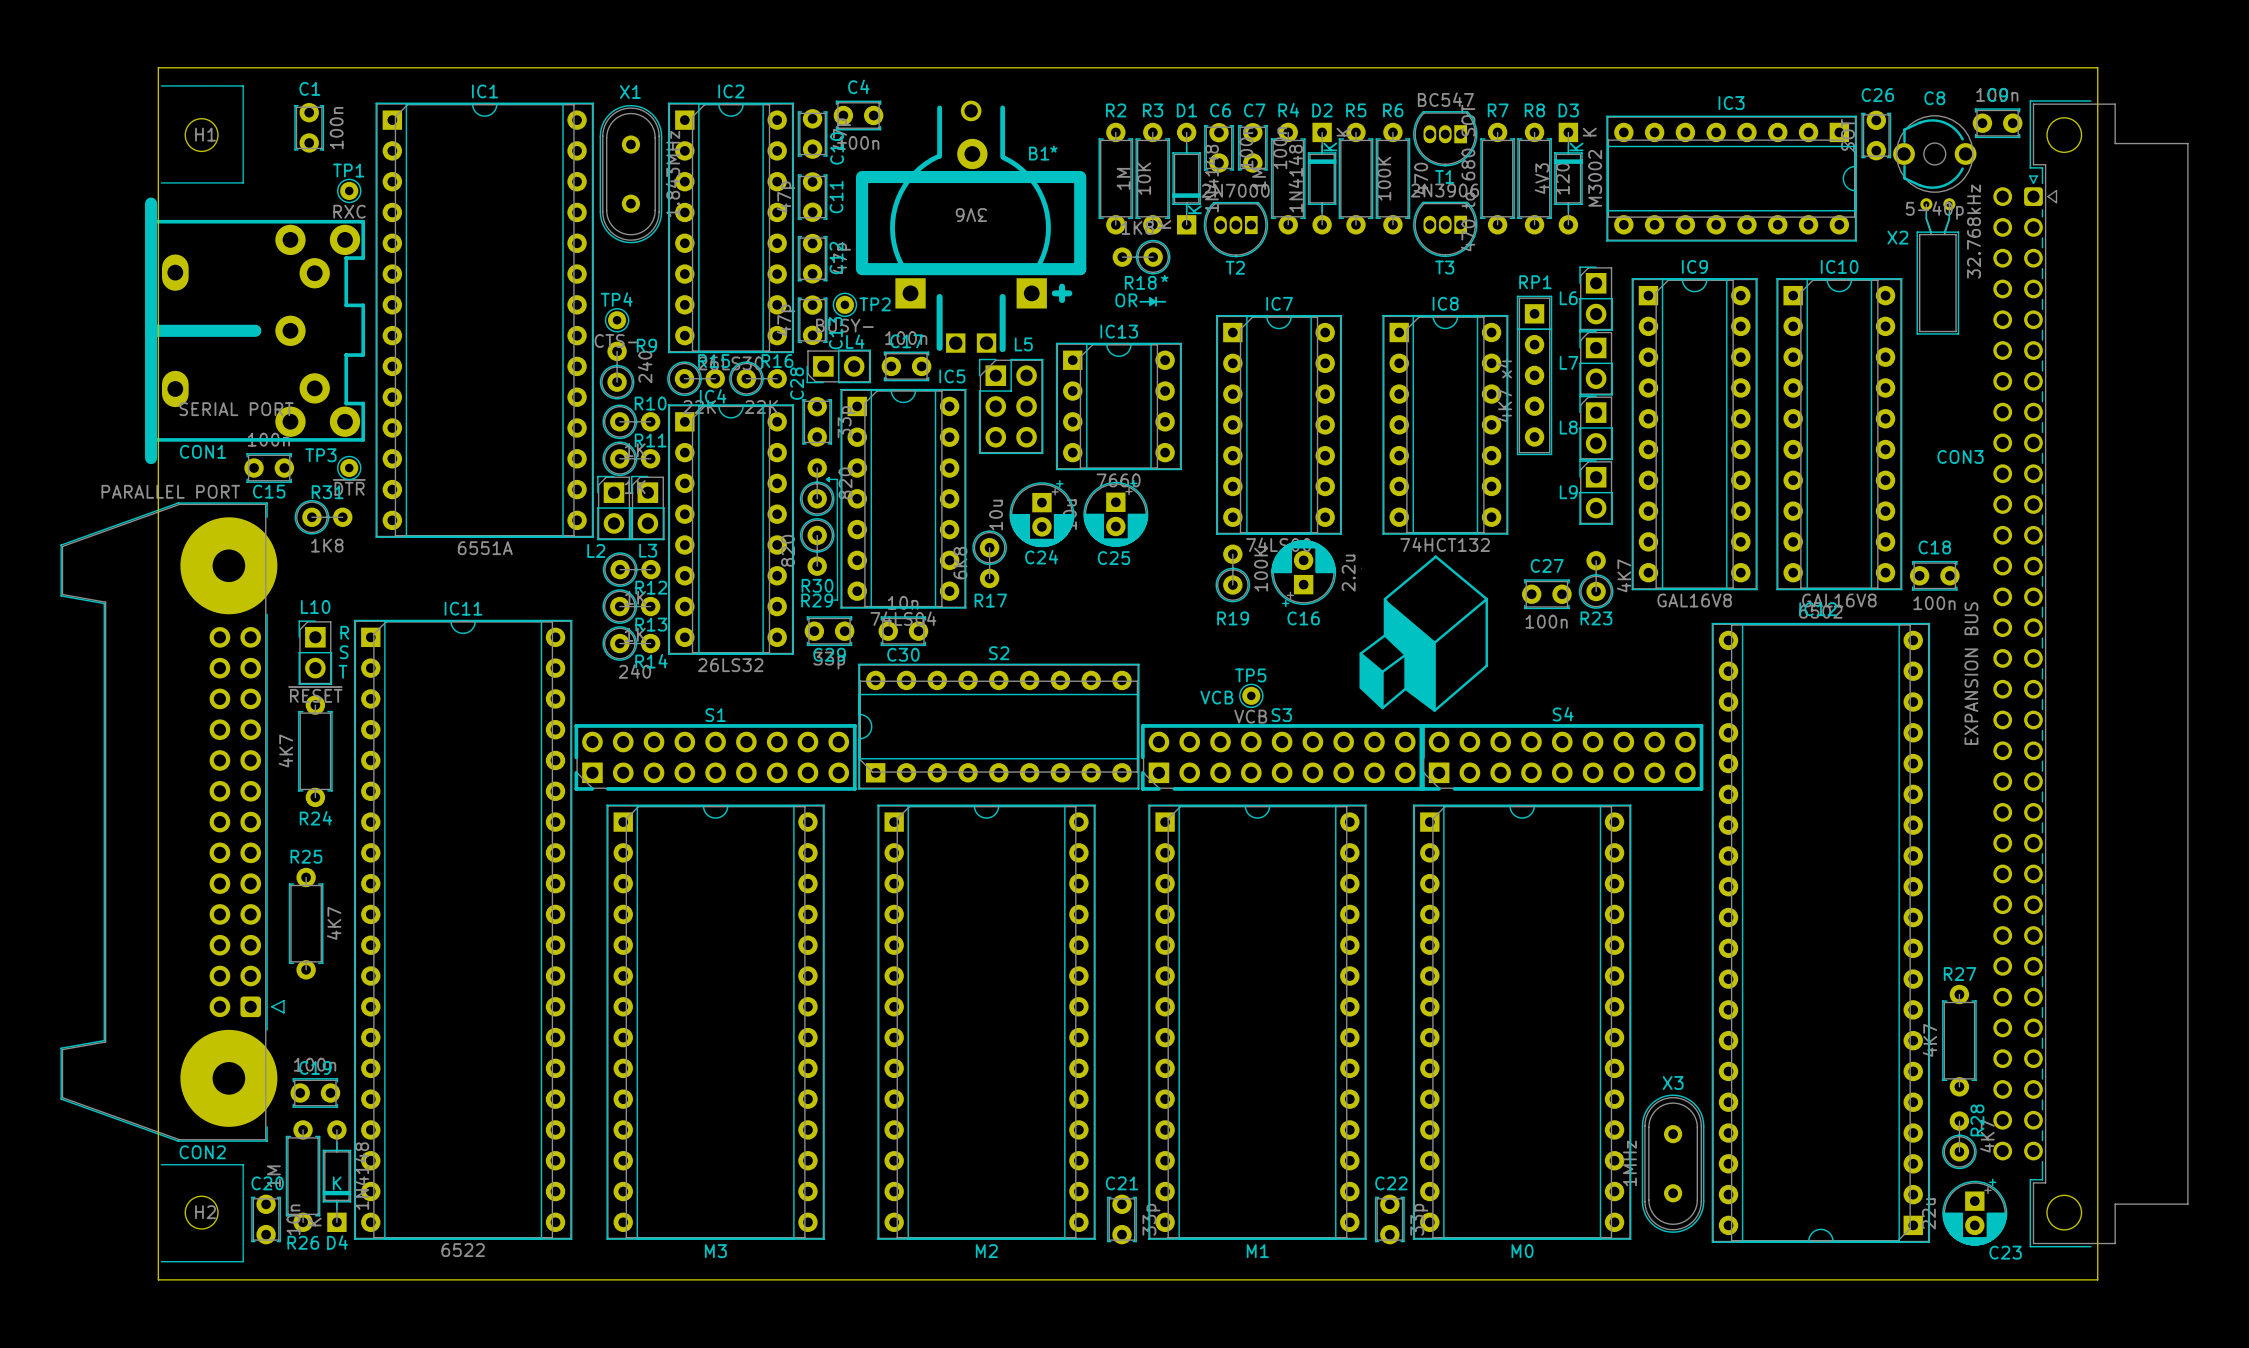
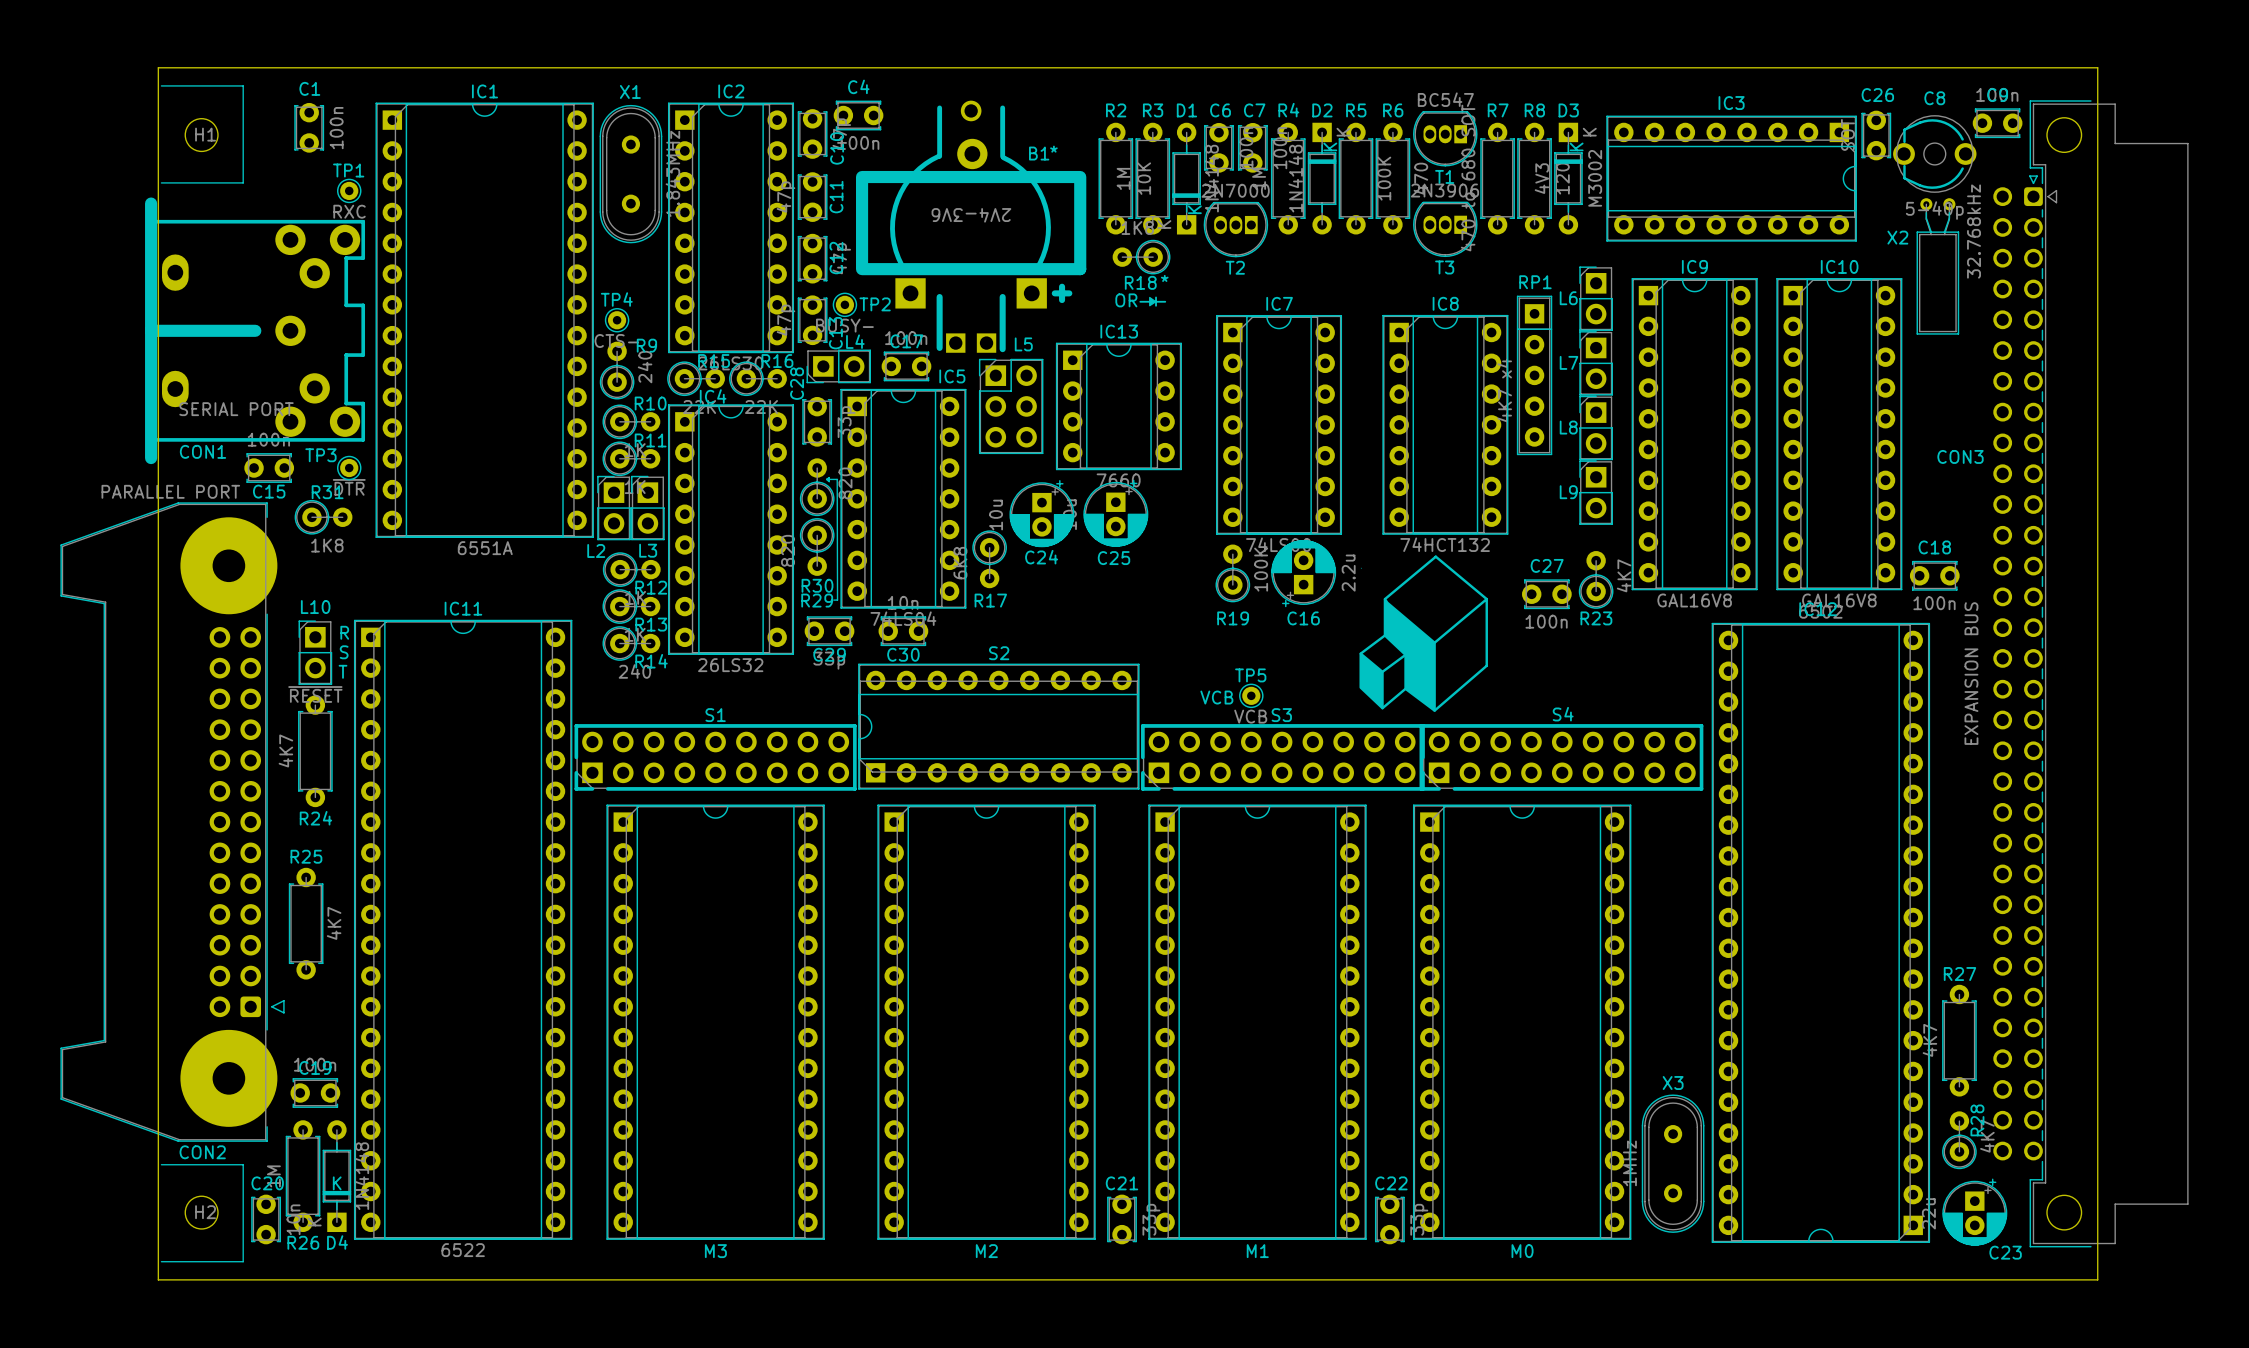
B1 value: 3V6 (971, 215) -> 2V4-3V6 (971, 215)

